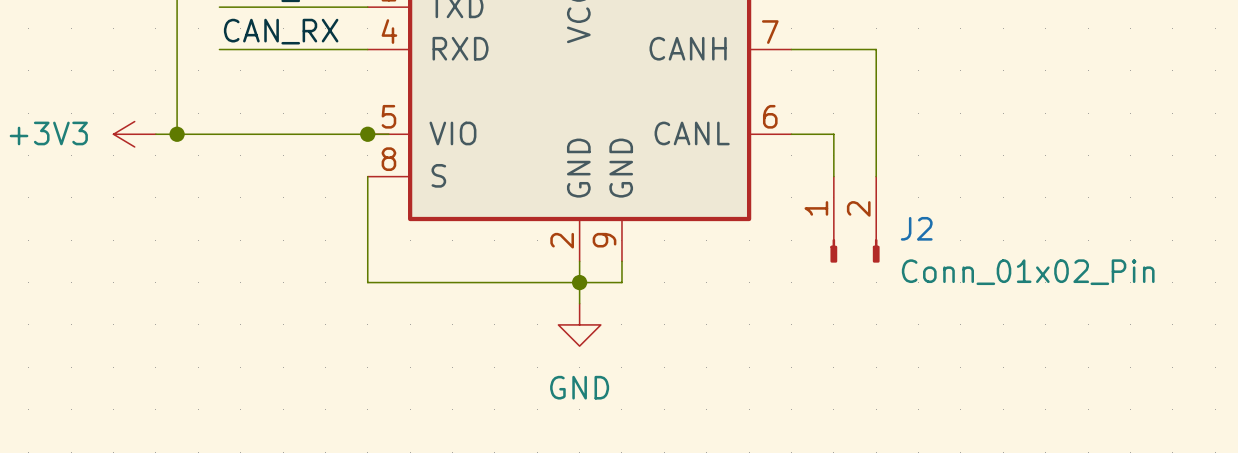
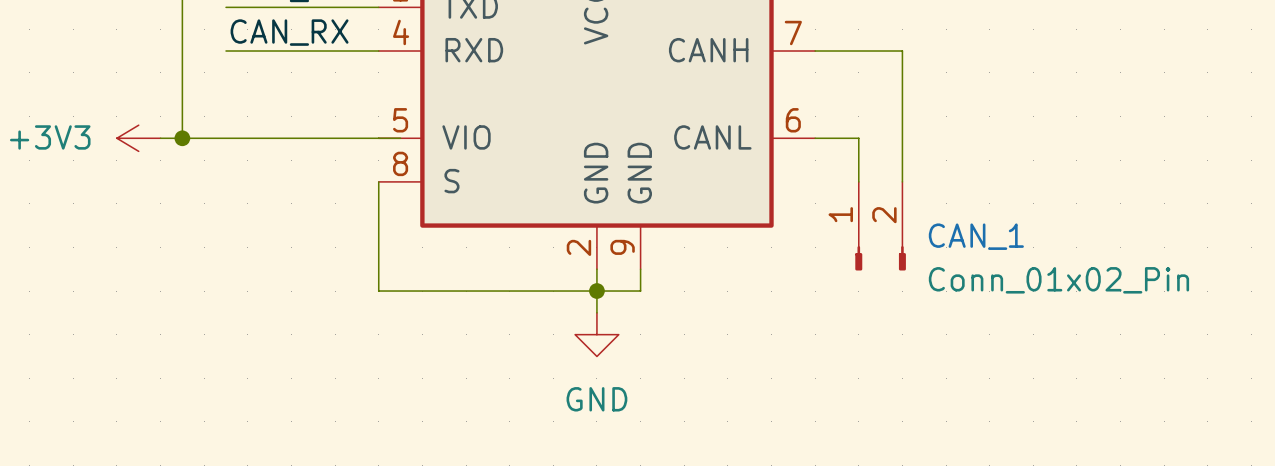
junction: (367, 134) -> none
J2 name: J2 (916, 228) -> CAN_1 (976, 236)

